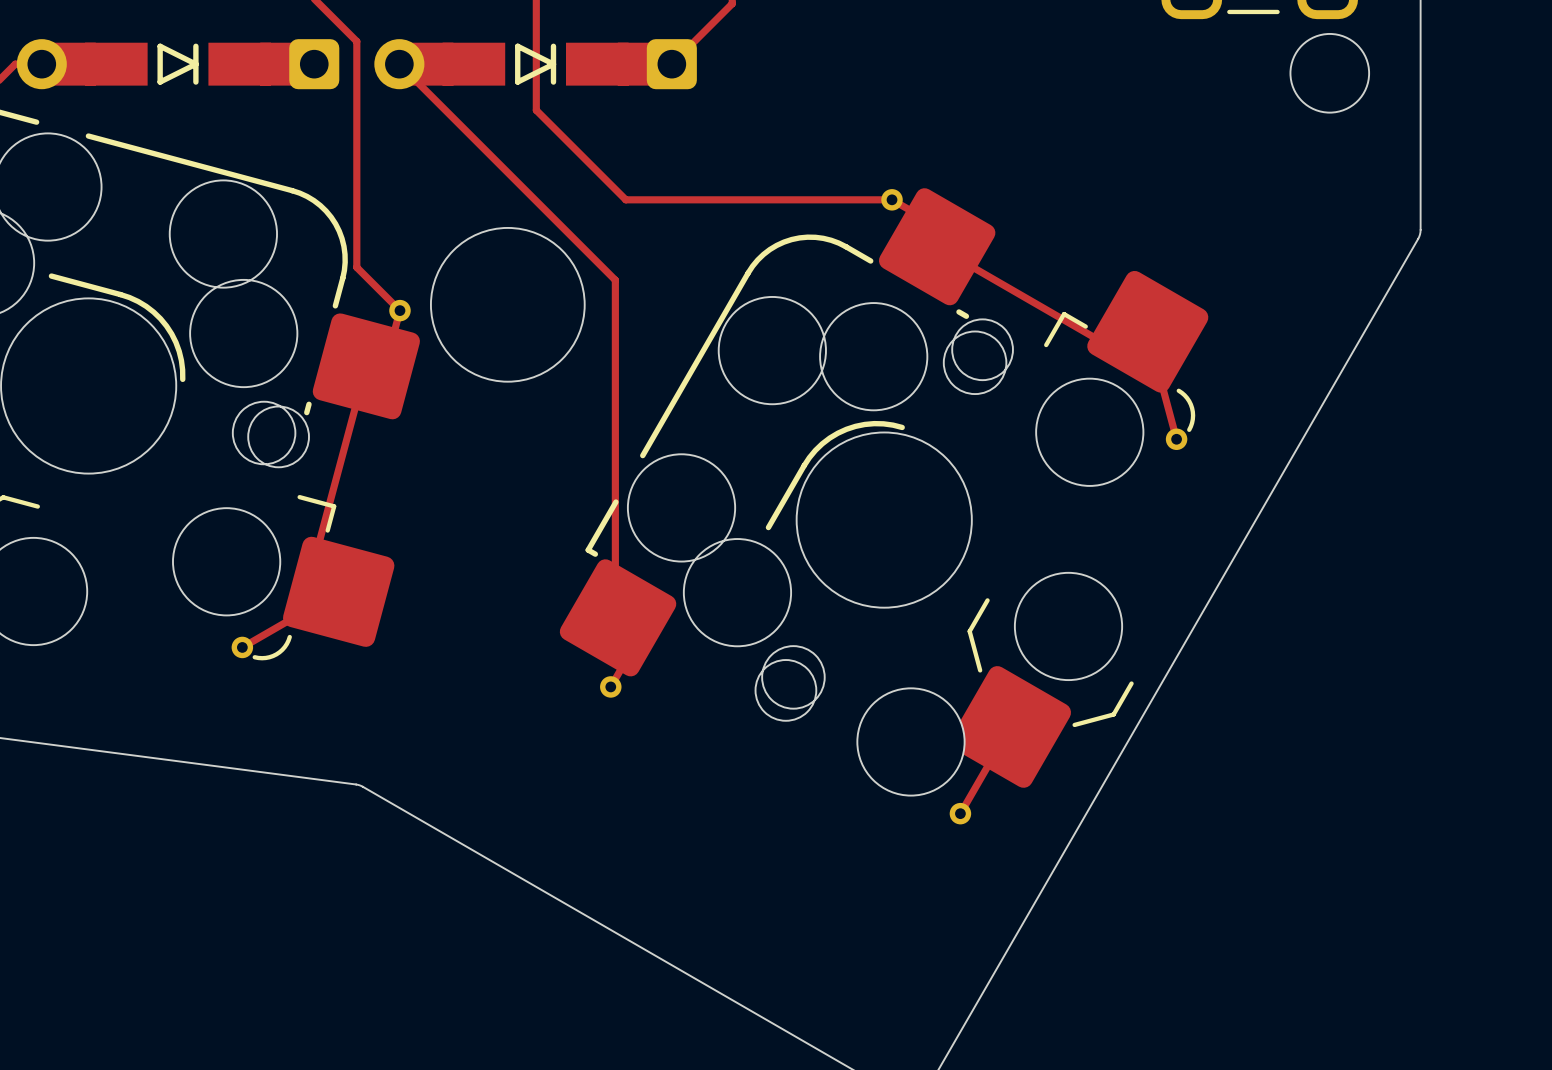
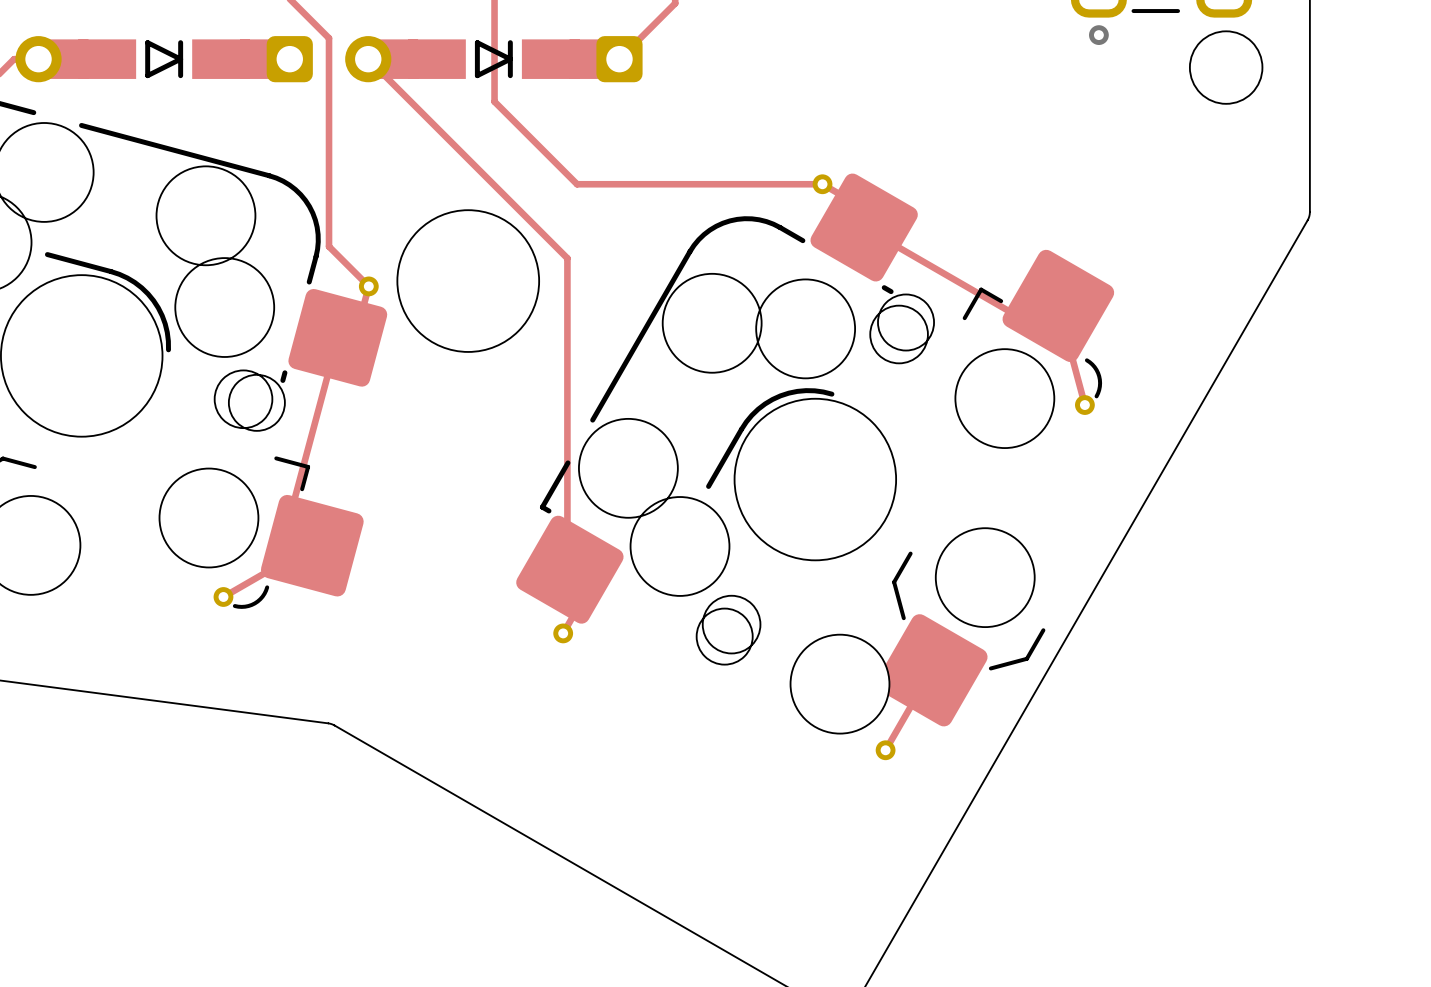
via: none -> (1098, 35)

